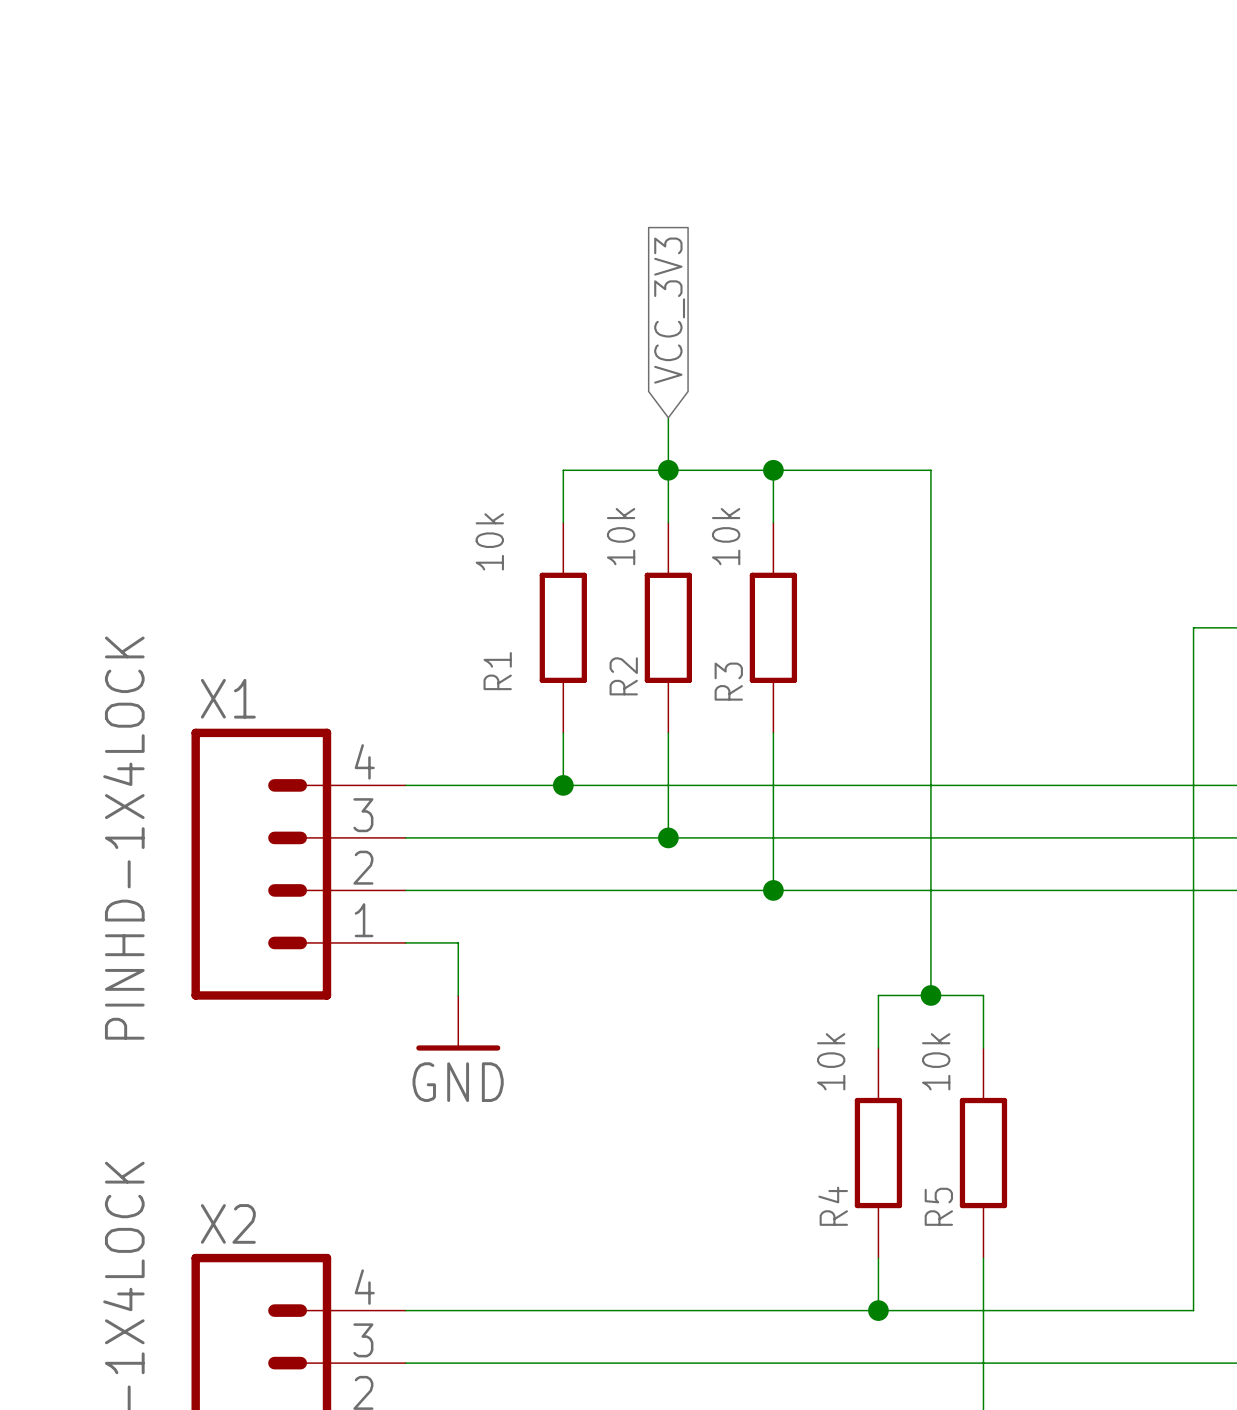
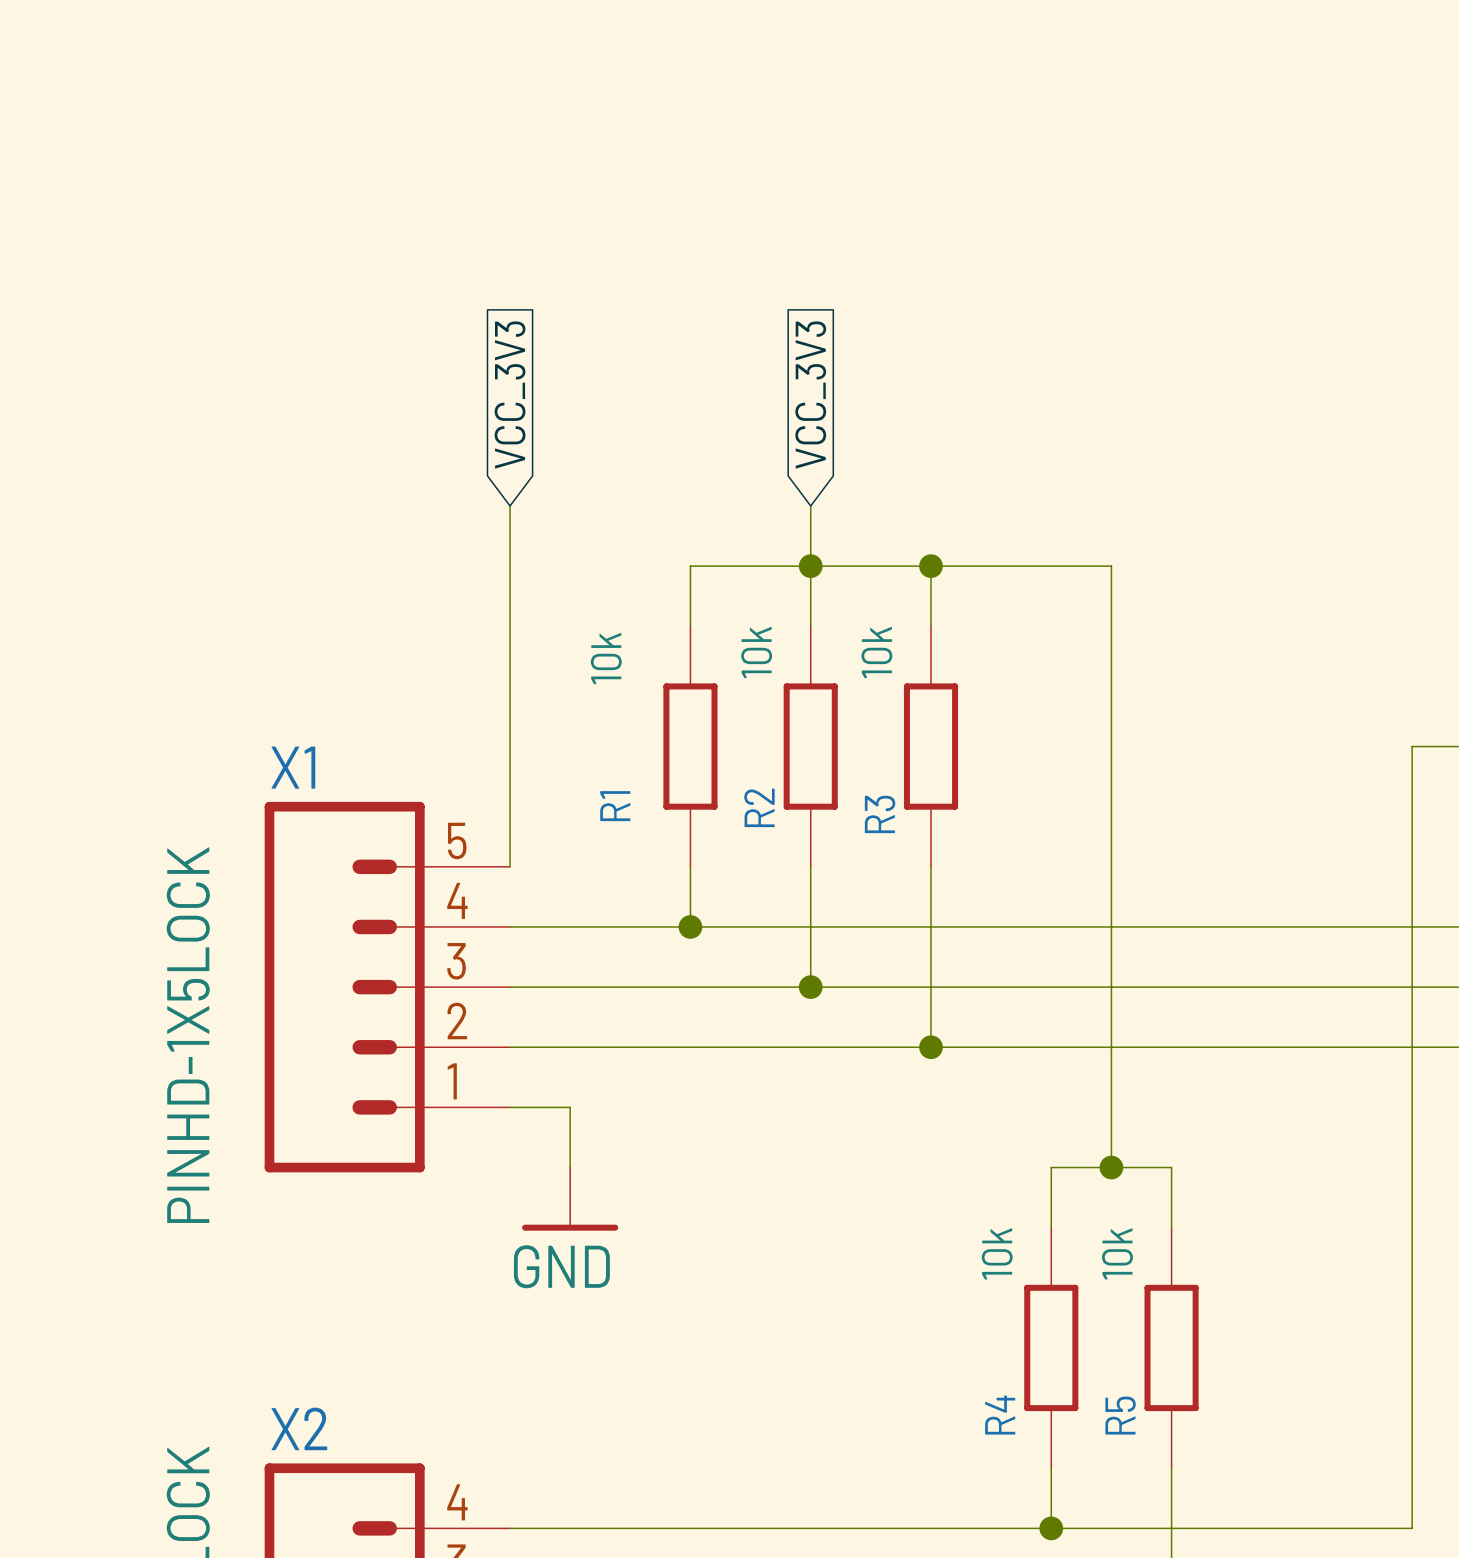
global label: none -> VCC_3V3 (510, 394)
wire: none -> (510, 505) (510, 866)
X1 symbol: [191, 728, 406, 1000] -> [264, 801, 511, 1173]
X1 value: PINHD-1X4LOCK (123, 838) -> PINHD-1X5LOCK (188, 1035)

